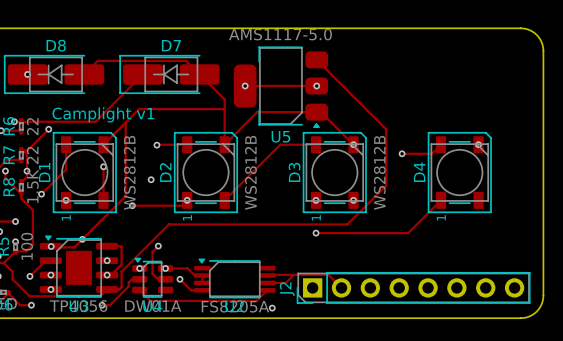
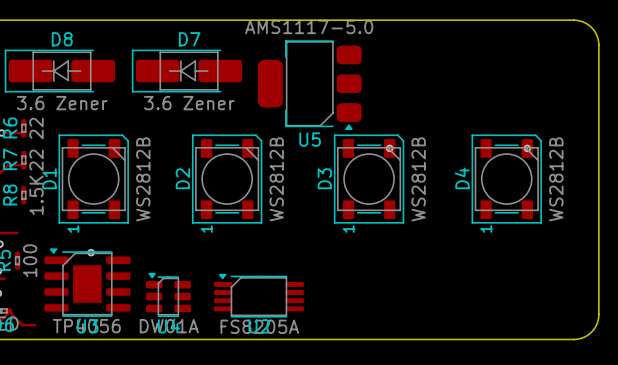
track: (316, 59) (386, 129) (386, 185) (347, 224) (168, 224) (121, 271) (121, 287) (119, 289) (107, 289) (100, 296) (29, 296) (12, 279) (12, 271) (3, 263) (15, 251) (26, 251) (32, 244) (32, 210) (21, 198) (21, 191) (5, 178) (5, 171) -> none
via: (27, 74) -> none
track: (84, 74) (97, 60) (186, 60) (224, 99) (224, 144) (257, 112) (320, 112) (353, 144) -> none
track: (142, 74) (95, 121) (14, 121) -> none
track: (245, 86) (316, 86) -> none
via: (245, 86) -> none
via: (316, 86) -> none
D8 value: none -> 3.6 Zener (62, 103)
D7 value: none -> 3.6 Zener (189, 103)
track: (224, 109) (139, 109) (103, 144) -> none
text: Camplight v1 (103, 114) -> none
via: (14, 121) -> none
track: (125, 122) (125, 196) (74, 247) (46, 246) -> none
track: (48, 129) (27, 150) (21, 150) -> none
via: (48, 129) -> none
track: (66, 144) (66, 169) (41, 194) -> none
track: (187, 144) (156, 145) -> none
track: (316, 144) (280, 144) (224, 200) -> none
track: (441, 144) (431, 153) (400, 153) -> none
via: (156, 145) -> none
track: (23, 150) (27, 154) (27, 176) (21, 182) -> none
via: (402, 153) -> none
track: (103, 166) (103, 200) -> none
via: (103, 166) -> none
via: (5, 171) -> none
via: (27, 171) -> none
D4 value: none -> WS2812B (556, 179)
via: (151, 179) -> none
via: (41, 194) -> none
via: (66, 200) -> none
track: (187, 200) (181, 205) (132, 205) -> none
via: (187, 200) -> none
via: (316, 200) -> none
via: (353, 200) -> none
track: (441, 200) (408, 233) (316, 233) -> none
via: (132, 205) -> none
via: (15, 221) -> none
via: (316, 233) -> none
via: (15, 241) -> none
via: (51, 246) -> none
track: (107, 246) (121, 246) (121, 264) (111, 275) (107, 275) -> none
track: (158, 246) (152, 251) (152, 273) (157, 279) (165, 279) -> none
via: (158, 246) -> none
track: (50, 260) (45, 260) (29, 276) -> none
via: (107, 260) -> none
via: (139, 268) -> none
track: (165, 268) (187, 268) (194, 275) (202, 275) (202, 282) -> none
via: (165, 268) -> none
track: (293, 274) (285, 282) (267, 282) -> none
via: (50, 275) -> none
via: (107, 275) -> none
track: (267, 275) (328, 274) (341, 287) -> none
via: (29, 276) -> none
track: (139, 279) (132, 279) (128, 282) (128, 286) (109, 305) (102, 305) -> none
track: (179, 279) (191, 290) (202, 290) -> none
via: (179, 279) -> none
J2: (413, 287) -> none
via: (50, 289) -> none
track: (139, 290) (150, 300) (256, 300) (267, 290) -> none
via: (31, 305) -> none
via: (102, 305) -> none
via: (272, 308) -> none

